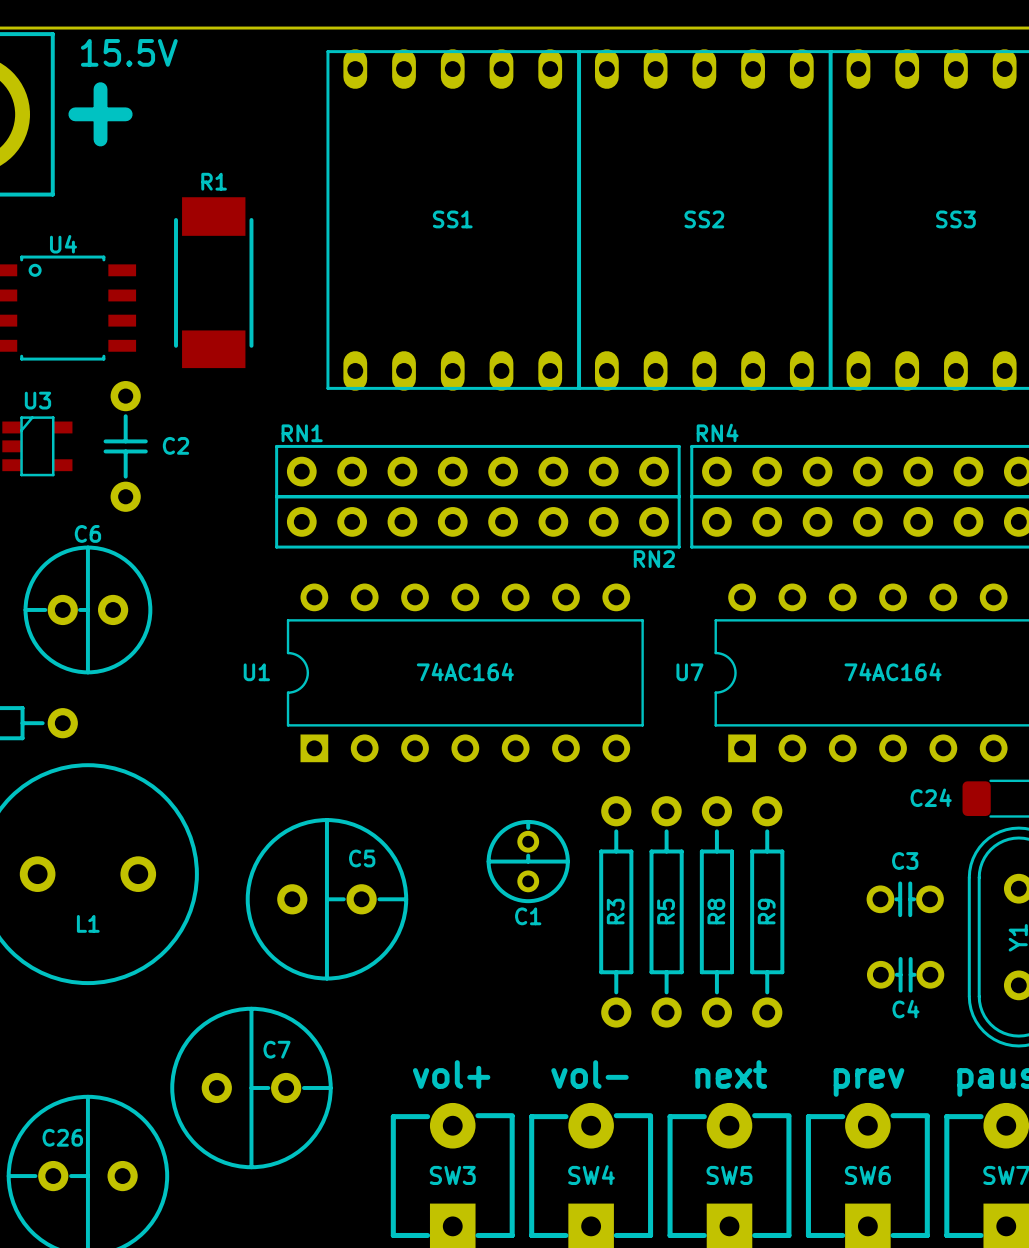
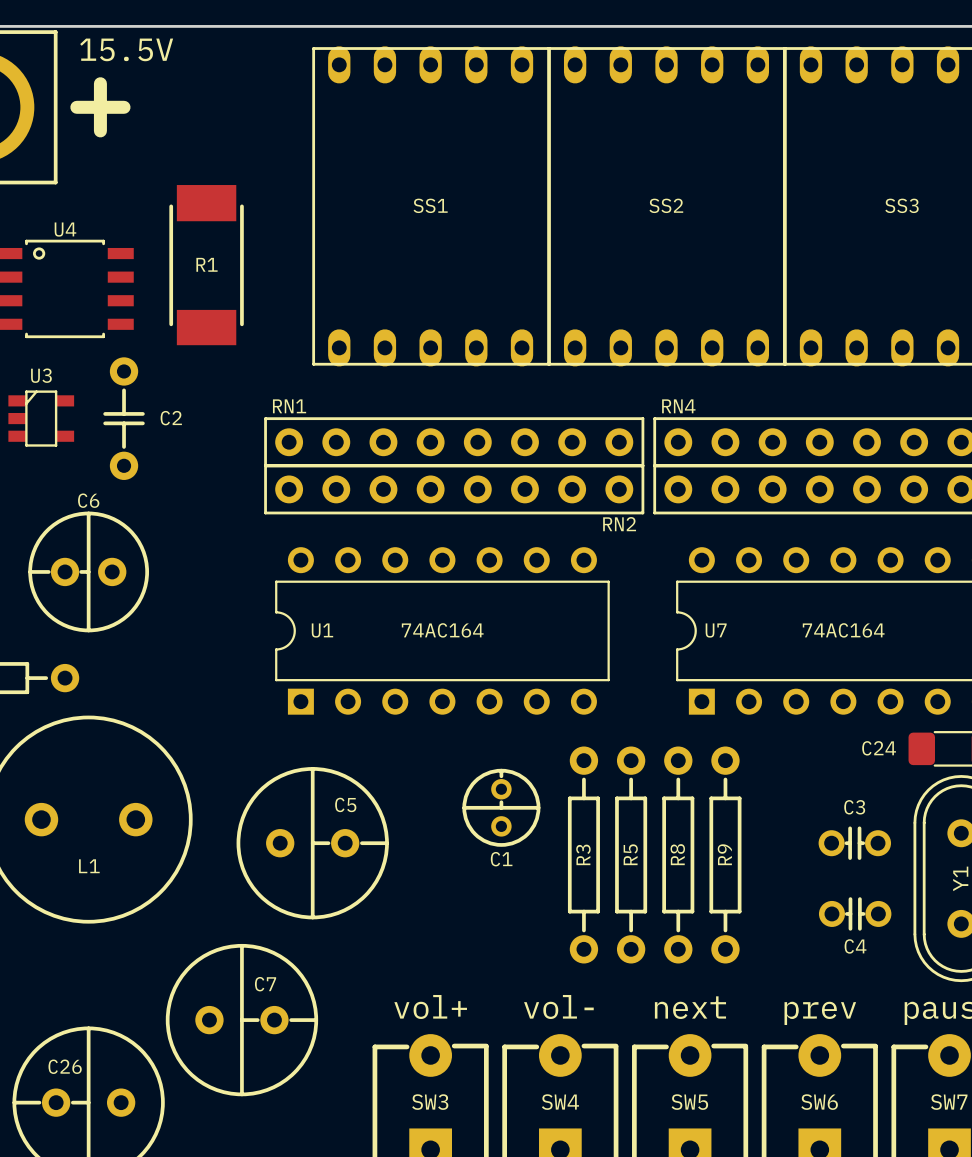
R1 name position: R1 (214, 181) -> R1 (207, 264)
U1 name position: U1 (256, 672) -> U1 (322, 630)
U7 name position: U7 (689, 672) -> U7 (716, 630)

